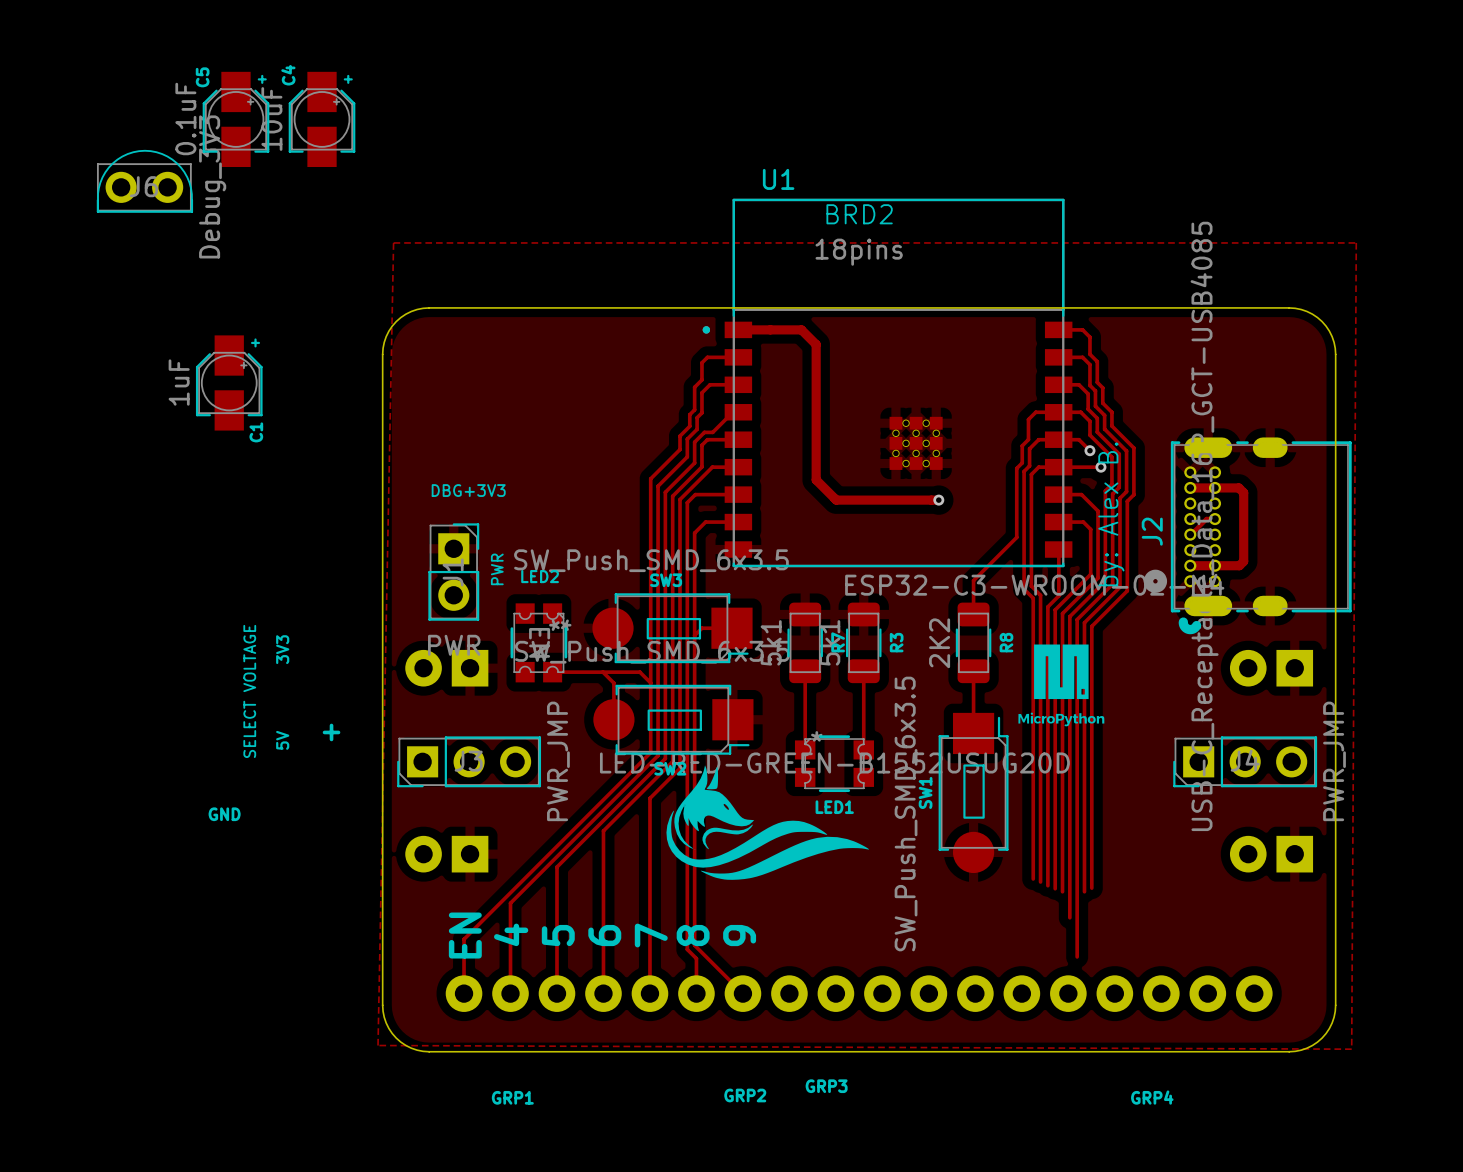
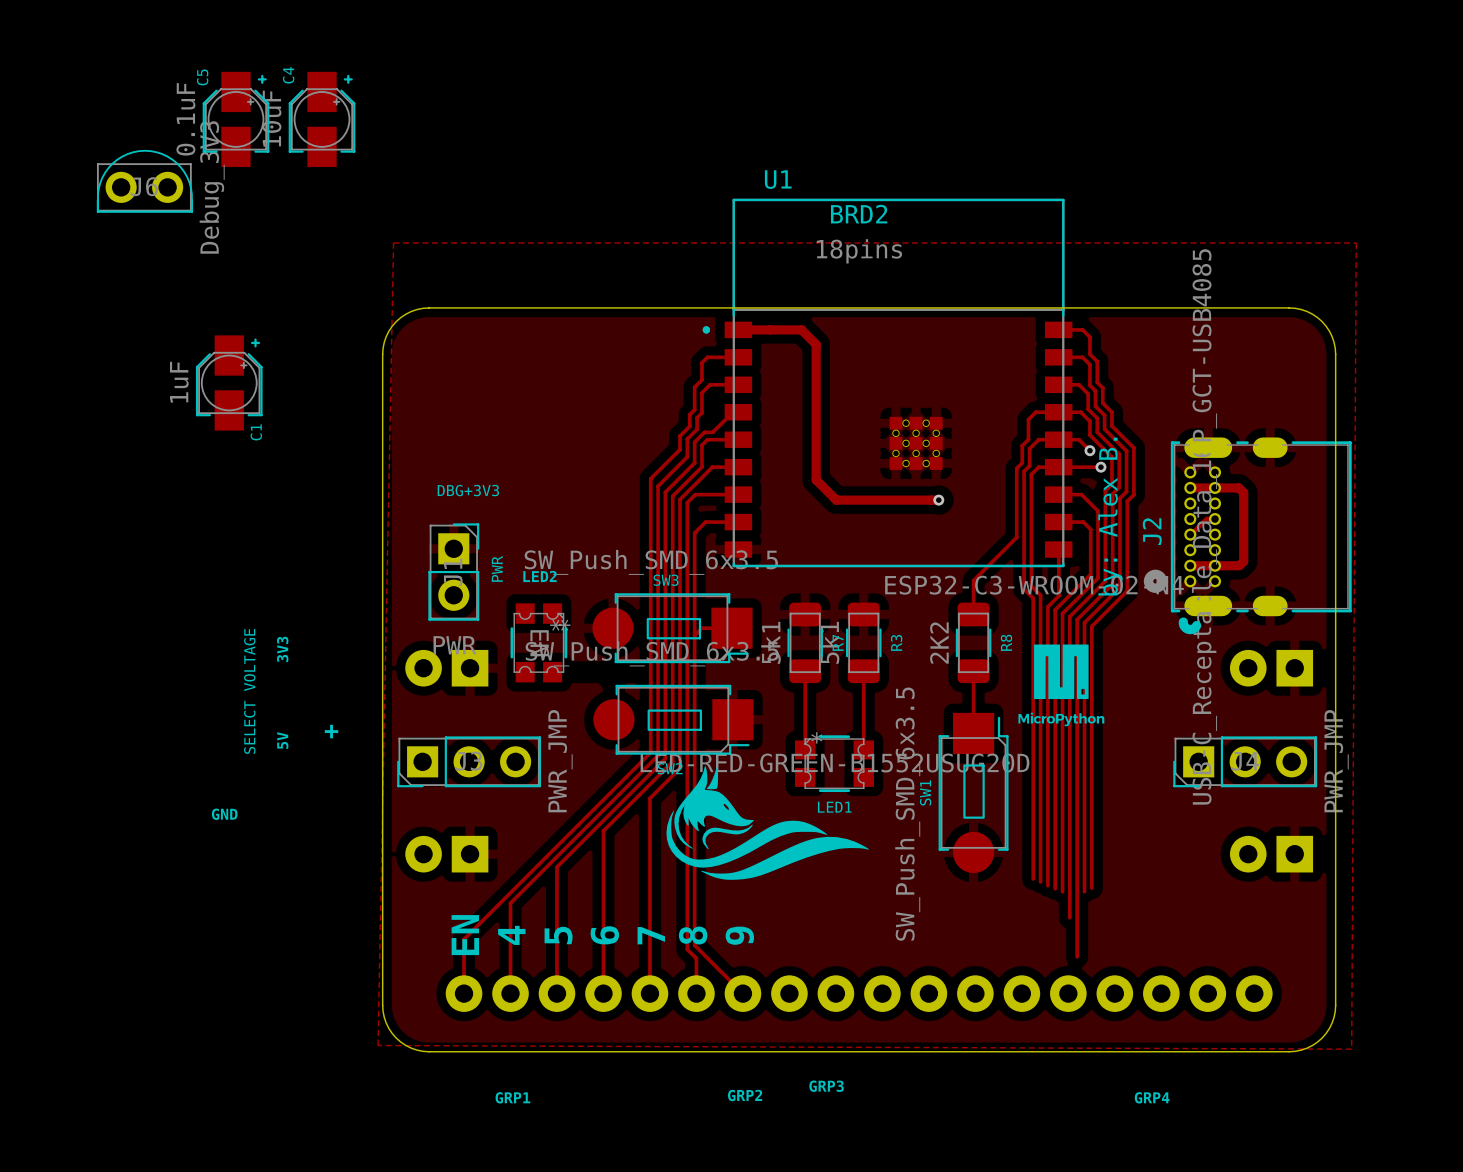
track: (552, 672) (639, 672) (650, 682) -> none
track: (602, 672) (613, 683) (613, 719) -> none

